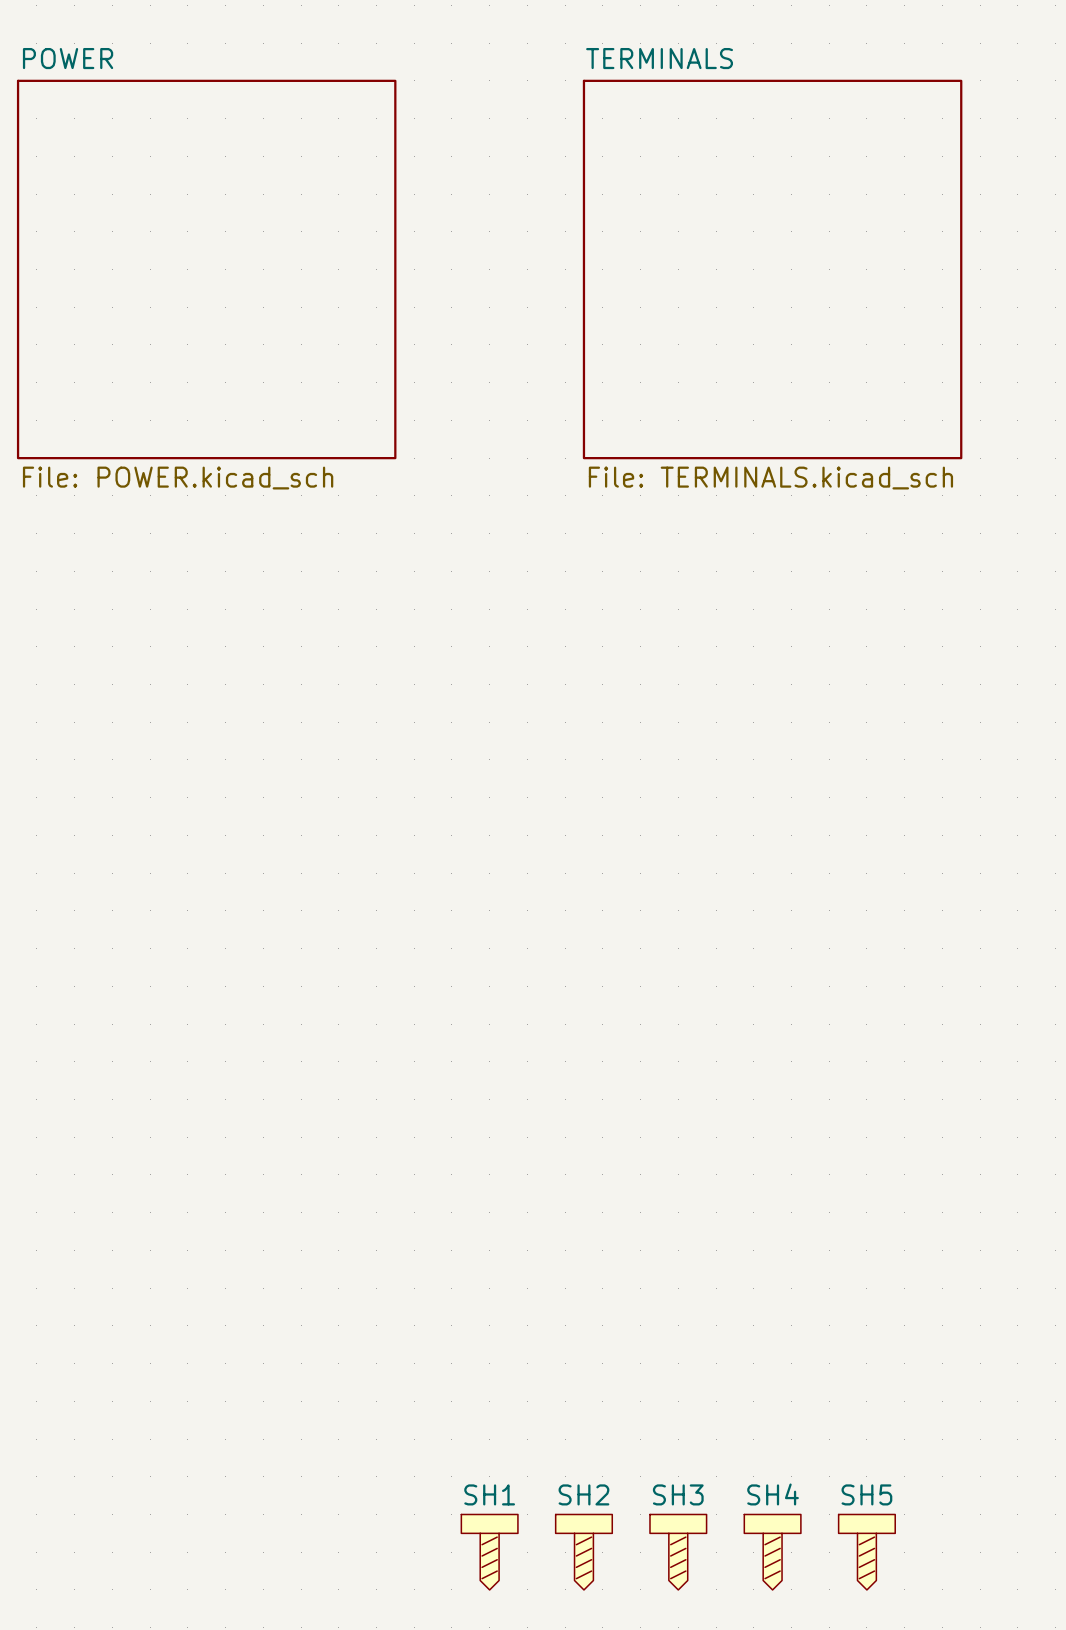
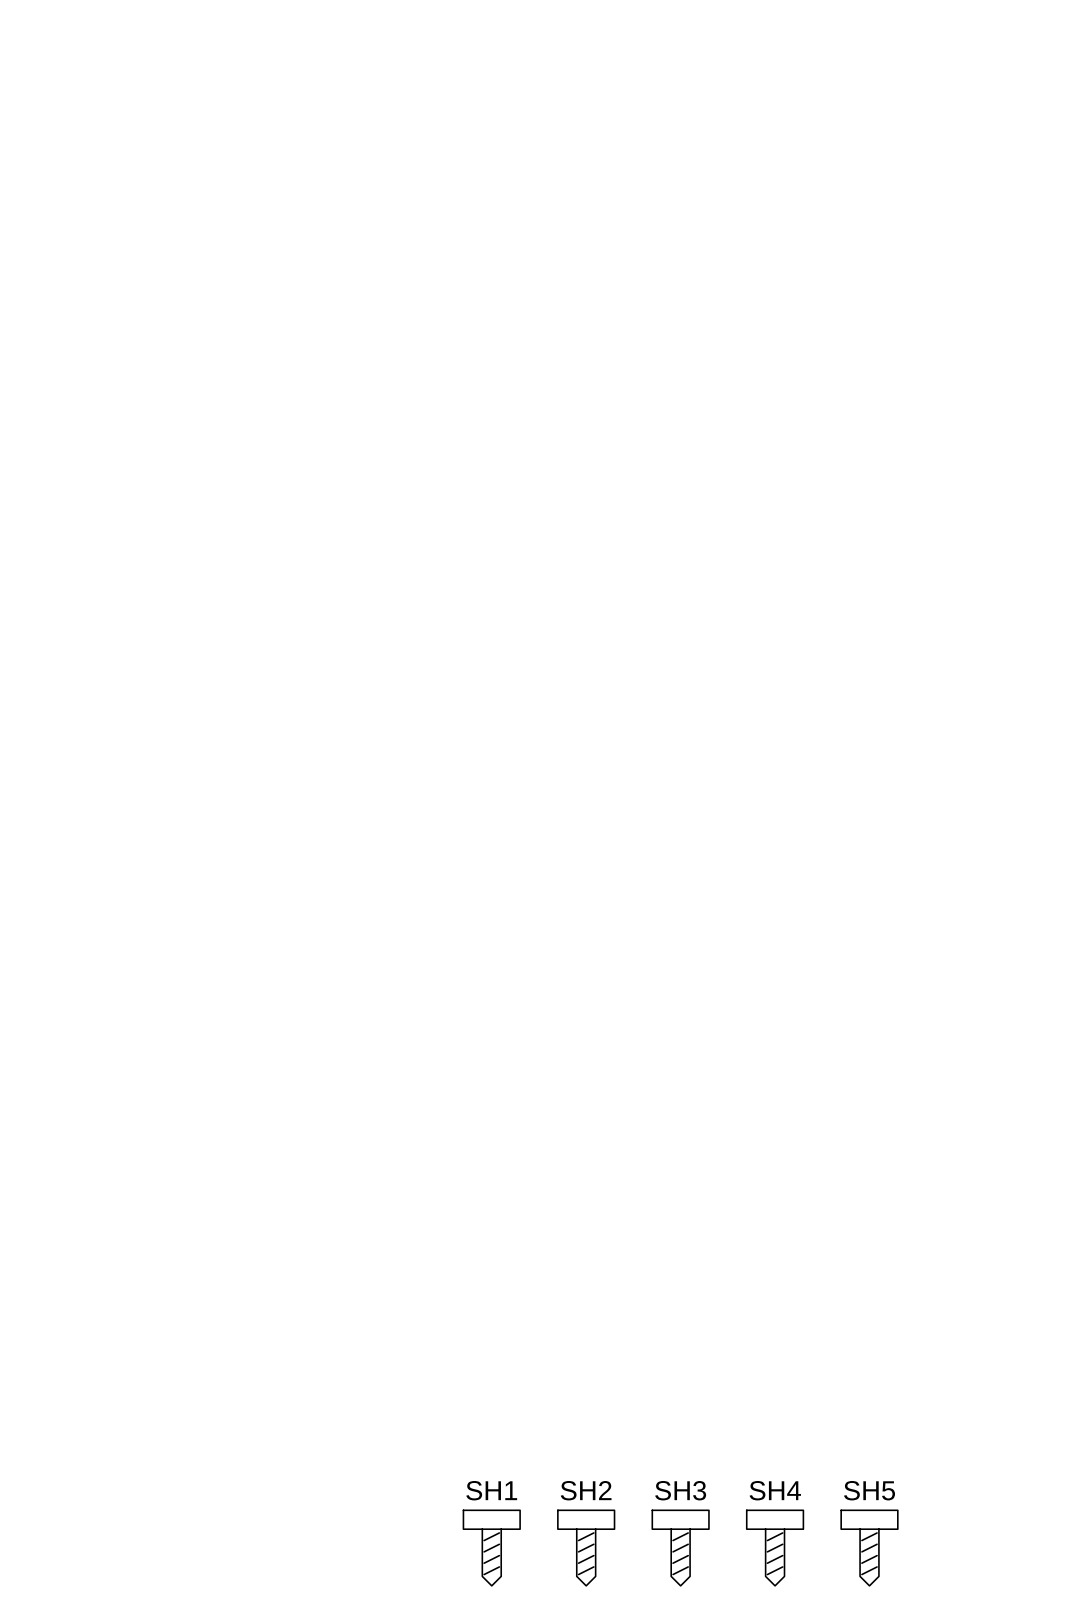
sheet POWER: File: POWER.kicad_sch (206, 269) -> none
sheet TERMINALS: File: TERMINALS.kicad_sch (772, 269) -> none

